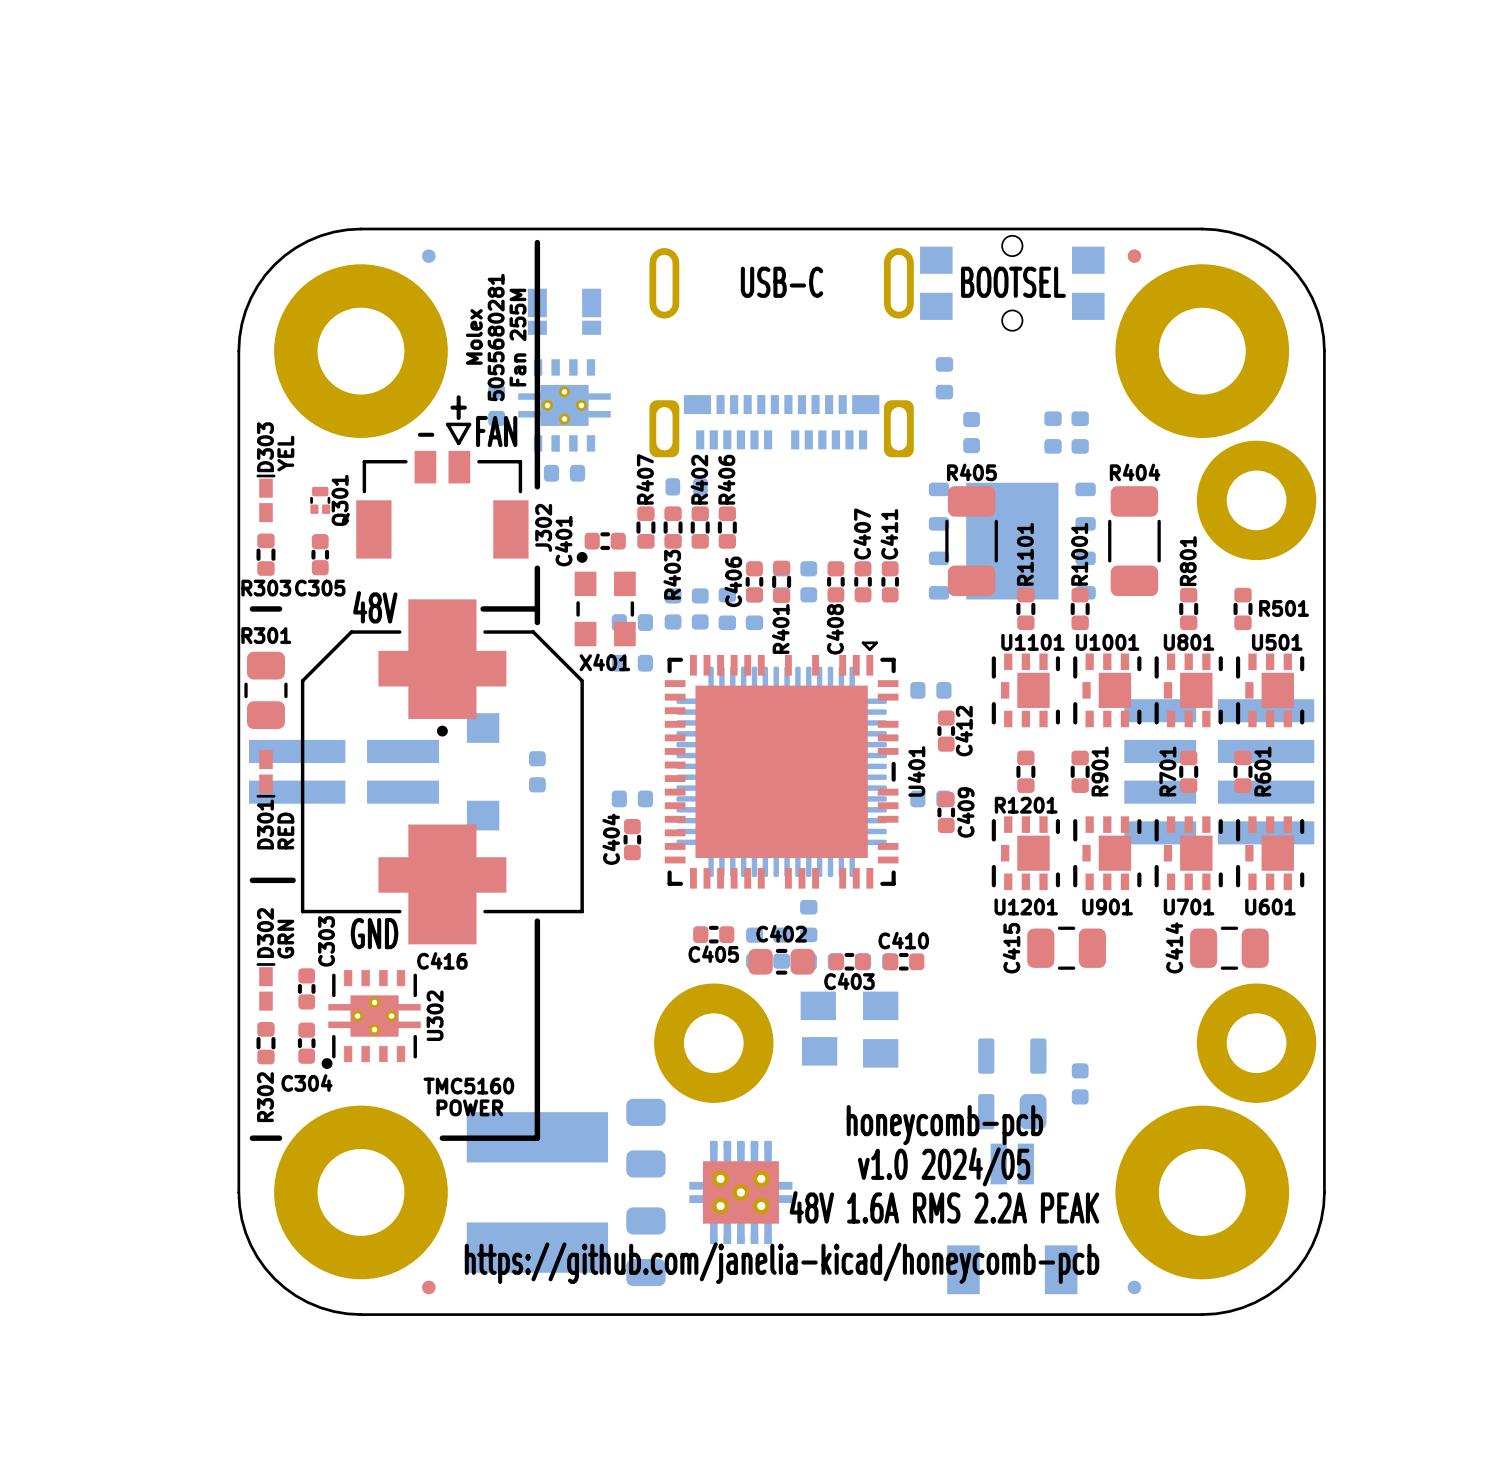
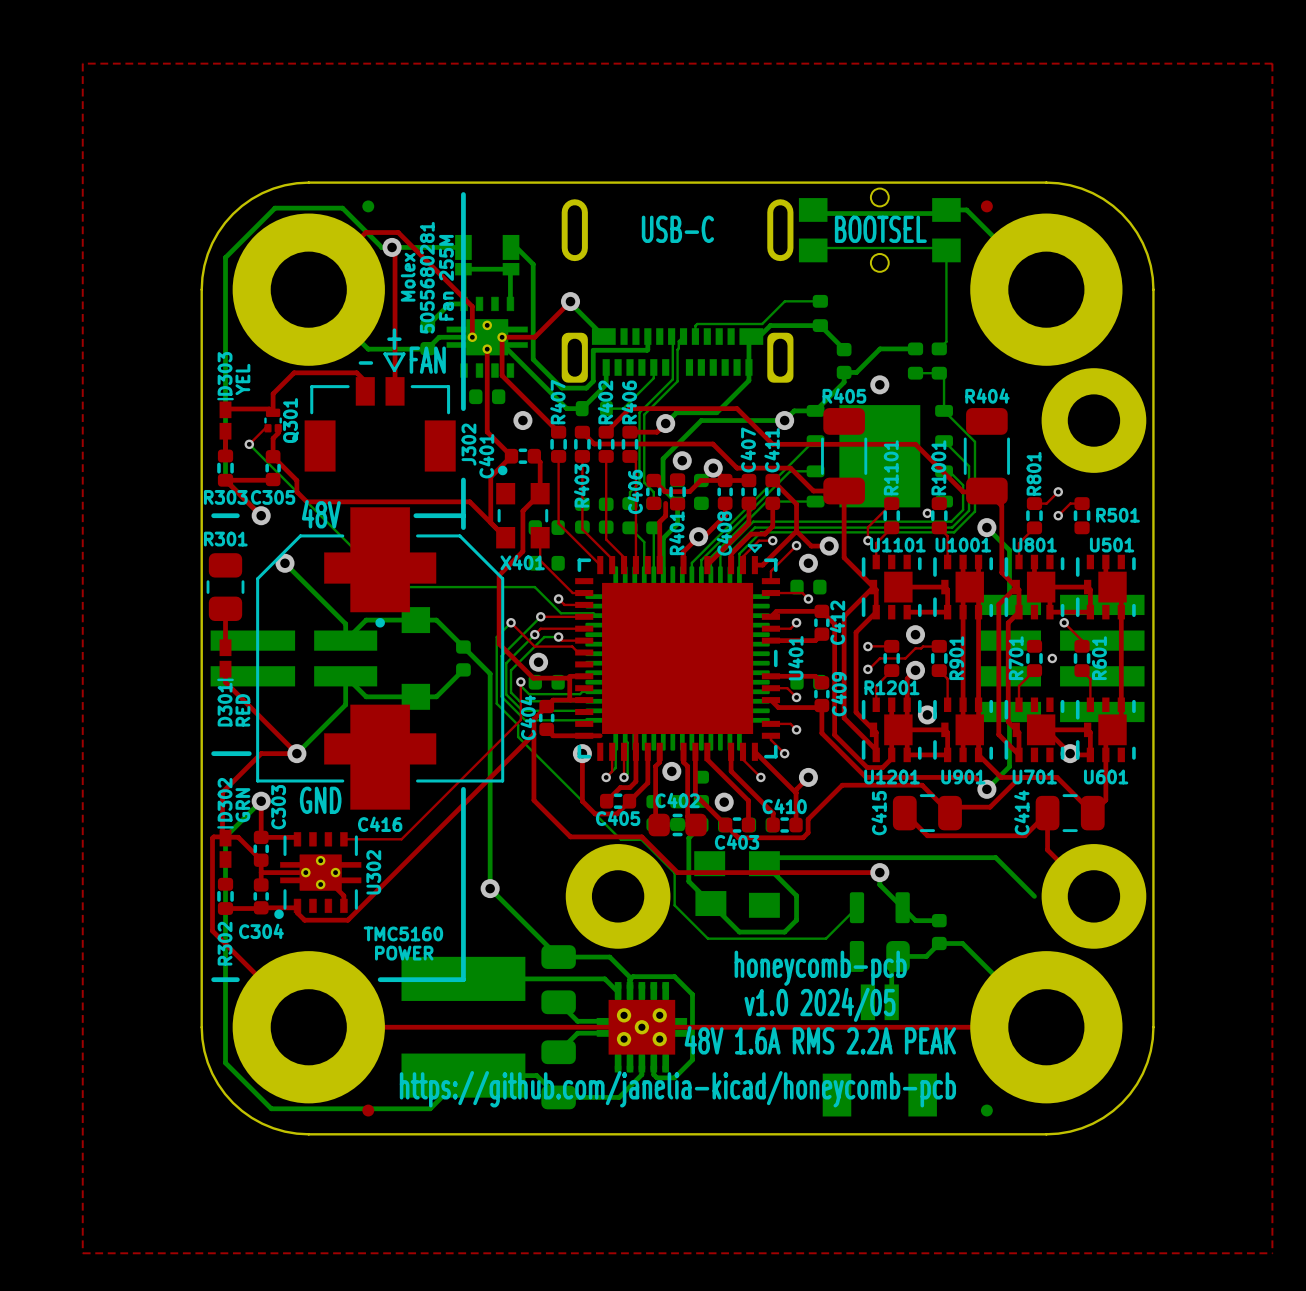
top zone outline: none -> (82, 63) (82, 1253) (1272, 1253) (1272, 63) (82, 63)
bottom track: none -> (813, 209) (816, 213) (942, 213) (946, 209) (966, 209) (1046, 289)
top track: none -> (392, 247) (395, 250) (395, 391)
via: none -> (392, 247)
bottom track: none -> (463, 247) (381, 247) (342, 208) (275, 208) (225, 257) (225, 480) (261, 515)
bottom track: none -> (511, 247) (516, 247) (533, 264) (533, 359) (561, 388) (586, 388) (593, 381) (593, 350) (647, 350) (647, 336)
bottom track: none -> (813, 250) (815, 248) (944, 248) (946, 250) (946, 341) (939, 348)
top track: none -> (308, 289) (365, 232) (398, 232) (472, 306) (472, 337)
bottom track: none -> (308, 289) (368, 349) (427, 349) (439, 337) (495, 337) (566, 408) (582, 408) (606, 384) (606, 367)
top track: none -> (570, 301) (534, 337) (502, 337) (502, 375) (558, 432)
bottom track: none -> (570, 301) (603, 336)
via: none -> (570, 301)
bottom track: none -> (820, 301) (784, 301) (762, 324) (697, 324) (695, 325) (695, 336)
bottom track: none -> (510, 303) (511, 269) (463, 269) (464, 303) (449, 303) (427, 325)
bottom track: none -> (671, 336) (672, 379) (639, 412) (639, 482) (629, 492) (629, 503)
bottom track: none -> (683, 336) (678, 341) (677, 349) (677, 381) (644, 414) (644, 482) (653, 492) (653, 503)
top track: none -> (487, 349) (487, 431) (511, 456) (490, 476) (490, 522)
bottom track: none -> (915, 348) (880, 348) (856, 372) (844, 372) (844, 382) (815, 410) (794, 410) (784, 420) (701, 420) (663, 458) (663, 488) (677, 503) (677, 523) (663, 538) (663, 587)
bottom track: none -> (844, 349) (820, 325) (770, 325) (759, 336) (751, 336) (748, 338) (748, 380) (716, 412) (676, 412) (665, 423)
bottom track: none -> (653, 367) (653, 378) (623, 408) (606, 408)
bottom track: none -> (915, 373) (939, 373) (944, 377) (944, 410) (974, 441) (974, 511) (954, 532) (760, 532) (739, 553) (739, 576)
via: none -> (879, 384)
top track: none -> (365, 391) (365, 381) (356, 372) (294, 372) (273, 393) (273, 412) (269, 408) (225, 408)
via: none -> (522, 420)
via: none -> (784, 420)
top track: none -> (665, 423) (657, 432) (629, 432)
via: none -> (665, 423)
top track: none -> (267, 428) (265, 428) (249, 444)
top track: none -> (278, 428) (278, 433) (273, 438) (273, 456) (296, 480) (296, 491) (306, 501) (469, 501) (505, 537)
top track: none -> (225, 432) (225, 455)
top track: none -> (582, 432) (594, 444) (712, 444) (737, 468) (790, 468) (813, 491) (844, 491) (844, 557) (876, 589) (876, 612) (856, 632) (856, 712) (876, 732) (876, 754)
top track: none -> (606, 432) (629, 408) (737, 408) (772, 444) (915, 444) (963, 491) (986, 491) (1001, 505) (1001, 572) (1019, 589) (1019, 612) (1008, 622) (1008, 721) (1019, 732) (1019, 754) (998, 734) (998, 604) (1016, 587)
bottom track: none -> (815, 441) (691, 562) (691, 576)
bottom track: none -> (944, 441) (969, 466) (969, 510) (952, 527) (754, 527) (729, 552) (729, 576)
bottom track: none -> (249, 444) (392, 587) (534, 587) (560, 613) (593, 613) (595, 615)
via: none -> (249, 444)
top track: none -> (534, 456) (540, 462) (540, 493) (522, 510) (522, 551) (499, 575) (499, 643) (533, 678) (584, 676)
top track: none -> (558, 456) (558, 523) (600, 565)
top track: none -> (582, 456) (582, 529) (612, 559) (612, 565)
top track: none -> (606, 456) (606, 539) (624, 557) (624, 565)
top track: none -> (629, 456) (635, 462) (635, 565)
via: none -> (682, 460)
via: none -> (713, 468)
bottom track: none -> (815, 471) (790, 471) (701, 560) (701, 576)
bottom track: none -> (944, 471) (949, 471) (963, 485) (963, 509) (951, 521) (753, 521) (720, 554) (720, 576)
top track: none -> (272, 480) (225, 480) (260, 515)
top track: none -> (653, 480) (664, 491) (689, 491) (700, 480) (748, 480)
top track: none -> (772, 480) (796, 504) (796, 531)
top track: none -> (1058, 491) (1046, 503) (1034, 503)
via: none -> (1058, 491)
bottom track: none -> (815, 501) (766, 501) (710, 557) (710, 576)
top track: none -> (665, 503) (665, 515) (659, 521) (659, 565)
top track: none -> (725, 503) (725, 515) (704, 536) (698, 536) (683, 551) (683, 565)
top track: none -> (748, 503) (748, 523) (707, 565)
top track: none -> (772, 503) (772, 526) (764, 534) (751, 534) (731, 554) (731, 565)
top track: none -> (891, 503) (867, 527) (867, 540)
top track: none -> (1082, 503) (1070, 503) (1058, 515)
via: none -> (927, 513)
via: none -> (261, 515)
via: none -> (1058, 515)
bottom track: none -> (629, 527) (644, 542) (644, 576)
bottom track: none -> (653, 527) (653, 576)
top track: none -> (891, 527) (876, 543) (876, 562)
top track: none -> (939, 527) (947, 536) (947, 562)
bottom track: none -> (986, 527) (1009, 550) (1009, 604)
via: none -> (986, 527)
top track: none -> (1034, 527) (1019, 543) (1019, 562)
top track: none -> (796, 531) (811, 546) (829, 546)
top track: none -> (796, 531) (762, 565) (754, 565)
via: none -> (698, 536)
top track: none -> (540, 537) (540, 560) (572, 593) (584, 593)
top track: none -> (772, 540) (759, 540) (743, 556) (743, 565)
via: none -> (772, 540)
via: none -> (867, 540)
top track: none -> (796, 545) (770, 571) (770, 581)
via: none -> (796, 545)
via: none -> (829, 546)
top track: none -> (963, 562) (963, 580) (978, 595) (978, 721) (963, 736) (963, 754)
top track: none -> (978, 562) (978, 578) (963, 593) (963, 723) (978, 738) (978, 754) (1001, 777) (1057, 777) (1092, 813) (1105, 800) (1105, 736) (1121, 721) (1121, 595) (1105, 580) (1105, 562)
top track: none -> (1034, 562) (1034, 580) (1049, 595) (1049, 612) (1090, 612) (1090, 589) (1087, 587) (1041, 587)
bottom track: none -> (284, 563) (345, 623) (345, 640) (366, 620) (436, 620) (490, 673) (490, 888) (558, 957) (609, 957) (629, 977) (629, 985)
via: none -> (284, 563)
via: none -> (808, 563)
top track: none -> (873, 587) (844, 616) (844, 717) (876, 750)
top track: none -> (898, 587) (944, 587) (947, 589) (947, 612) (907, 612)
top track: none -> (770, 593) (802, 593) (808, 598)
top track: none -> (558, 598) (564, 604) (584, 604)
via: none -> (558, 598)
via: none -> (808, 598)
top track: none -> (225, 608) (225, 646)
top track: none -> (540, 616) (584, 616)
bottom track: none -> (540, 616) (501, 656) (501, 696) (525, 720) (595, 720)
via: none -> (540, 616)
top track: none -> (770, 616) (776, 611) (821, 611) (834, 624) (834, 735) (867, 767) (882, 767) (891, 758) (891, 736) (907, 721) (907, 678) (915, 670)
top track: none -> (511, 622) (534, 646) (572, 646) (578, 652) (584, 652)
bottom track: none -> (511, 622) (496, 637) (496, 703) (518, 725) (518, 736) (621, 839) (641, 839) (674, 872) (674, 905) (707, 938) (826, 938) (856, 907)
via: none -> (511, 622)
top track: none -> (796, 622) (790, 628) (770, 628)
via: none -> (796, 622)
top track: none -> (1064, 622) (1082, 640) (1082, 646)
via: none -> (1064, 622)
top track: none -> (584, 628) (540, 628) (534, 634)
bottom track: none -> (534, 634) (506, 663) (506, 694) (522, 710) (595, 710)
via: none -> (534, 634)
top track: none -> (821, 634) (815, 640) (770, 640)
via: none -> (915, 634)
top track: none -> (558, 637) (562, 640) (584, 640)
bottom track: none -> (558, 637) (544, 637) (511, 670) (511, 692) (519, 701) (595, 701)
via: none -> (558, 637)
top track: none -> (868, 646) (891, 646)
via: none -> (867, 646)
top track: none -> (939, 646) (915, 648) (905, 658) (879, 658) (867, 669)
via: none -> (1052, 658)
via: none -> (538, 662)
top track: none -> (225, 670) (225, 682) (296, 753) (261, 753) (222, 792) (222, 834) (225, 837) (238, 837) (261, 860) (261, 884)
bottom track: none -> (463, 669) (436, 696) (366, 696) (345, 676) (345, 704) (296, 753)
via: none -> (867, 669)
top track: none -> (891, 670) (876, 686) (876, 704)
via: none -> (915, 670)
top track: none -> (939, 670) (947, 678) (947, 704)
top track: none -> (1034, 670) (1019, 686) (1019, 704)
top track: none -> (1082, 670) (1090, 678) (1090, 704)
top track: none -> (569, 676) (570, 700)
top track: none -> (770, 676) (815, 676) (821, 682)
top track: none -> (520, 681) (520, 720) (401, 839) (343, 839)
bottom track: none -> (520, 681) (520, 685) (529, 694) (580, 694) (582, 691) (595, 691)
via: none -> (520, 681)
top track: none -> (770, 688) (787, 688) (796, 697)
via: none -> (796, 697)
top track: none -> (584, 700) (553, 700) (533, 719) (533, 800) (570, 836) (641, 836) (677, 872) (879, 872)
top track: none -> (635, 700) (635, 781) (629, 787) (620, 787) (606, 801)
top track: none -> (770, 700) (778, 707) (819, 707) (821, 705) (821, 733) (866, 777) (974, 777) (986, 789)
top track: none -> (891, 704) (891, 723) (907, 738) (907, 754) (947, 754) (947, 732) (944, 729) (898, 729)
bottom track: none -> (1009, 711) (1009, 766) (986, 789)
via: none -> (927, 714)
top track: none -> (770, 723) (790, 723) (796, 729)
top track: none -> (546, 729) (553, 735) (600, 735)
via: none -> (796, 729)
top track: none -> (1041, 729) (1087, 729) (1090, 732) (1090, 754) (1071, 754) (1046, 729)
top track: none -> (533, 734) (347, 920) (304, 920) (297, 913) (297, 905) (295, 907) (225, 908)
top track: none -> (770, 735) (770, 739) (784, 753)
bottom track: none -> (615, 740) (615, 767) (606, 777)
bottom track: none -> (625, 740) (627, 742) (627, 773) (624, 777)
top track: none -> (612, 751) (612, 771) (606, 777)
top track: none -> (624, 751) (624, 777)
top track: none -> (647, 751) (647, 782) (616, 813) (595, 813) (582, 801) (582, 753)
top track: none -> (659, 751) (659, 762) (655, 766) (655, 821) (659, 825)
top track: none -> (683, 751) (683, 762) (687, 766) (687, 816) (696, 825)
top track: none -> (695, 751) (695, 794) (738, 837) (803, 837) (808, 832) (808, 819) (842, 785) (922, 785) (950, 813) (955, 807) (990, 807) (1019, 777)
top track: none -> (707, 751) (707, 759) (748, 800) (748, 825)
top track: none -> (731, 751) (731, 771) (773, 813) (773, 825)
top track: none -> (743, 751) (743, 759) (760, 777)
top track: none -> (754, 751) (796, 792)
via: none -> (296, 753)
via: none -> (582, 753)
via: none -> (784, 753)
via: none -> (1070, 753)
via: none -> (671, 771)
via: none -> (606, 777)
via: none -> (624, 777)
via: none -> (760, 777)
top track: none -> (808, 777) (796, 789) (796, 825)
via: none -> (808, 777)
via: none -> (986, 789)
top track: none -> (261, 801) (261, 837) (295, 837) (297, 839)
bottom track: none -> (261, 801) (225, 836) (225, 1062) (271, 1108) (430, 1108) (463, 1075) (536, 1075) (558, 1097) (619, 1097) (641, 1074) (641, 1062)
via: none -> (261, 801)
via: none -> (724, 802)
top track: none -> (904, 813) (927, 835) (1024, 835) (1047, 813) (1047, 849) (1093, 896)
bottom track: none -> (653, 824) (701, 825) (688, 838) (688, 881) (739, 932) (784, 932) (796, 920) (796, 895) (764, 863) (770, 857) (995, 857) (1034, 896)
top track: none -> (225, 836) (212, 838) (212, 930) (308, 1027) (612, 1027) (624, 1039)
top track: none -> (261, 872) (320, 872) (343, 895) (343, 905)
bottom track: none -> (879, 872) (879, 884) (915, 920) (939, 920)
via: none -> (879, 872)
via: none -> (490, 888)
bottom track: none -> (463, 978) (604, 978) (618, 992)
bottom track: none -> (629, 979) (633, 976) (674, 976) (692, 994) (692, 1059) (674, 1077) (656, 1077) (653, 1074) (653, 1062)
bottom track: none -> (558, 1002) (577, 1021) (605, 1021)
bottom track: none -> (891, 1002) (891, 962) (898, 956) (926, 956) (939, 943) (962, 943) (1046, 1027)
top track: none -> (641, 1027) (1046, 1027)
bottom track: none -> (605, 1033) (577, 1033) (558, 1052)

